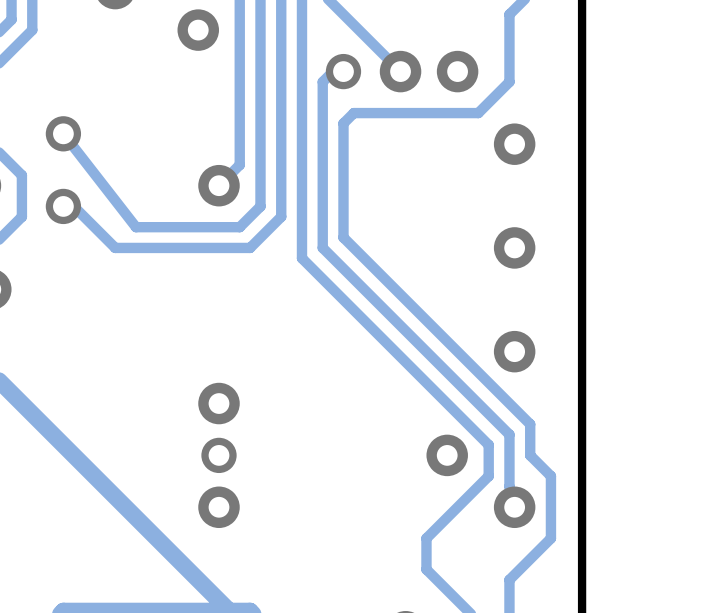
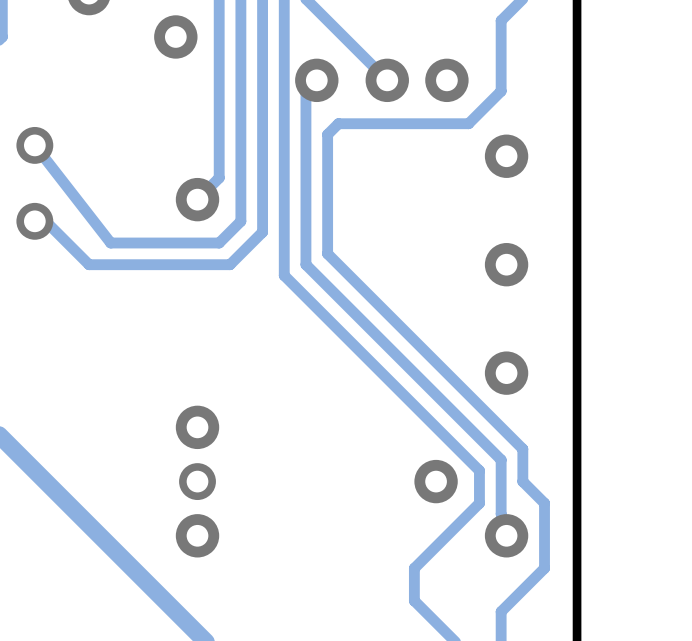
via size: [325, 53, 362, 90] -> [295, 58, 339, 103]

